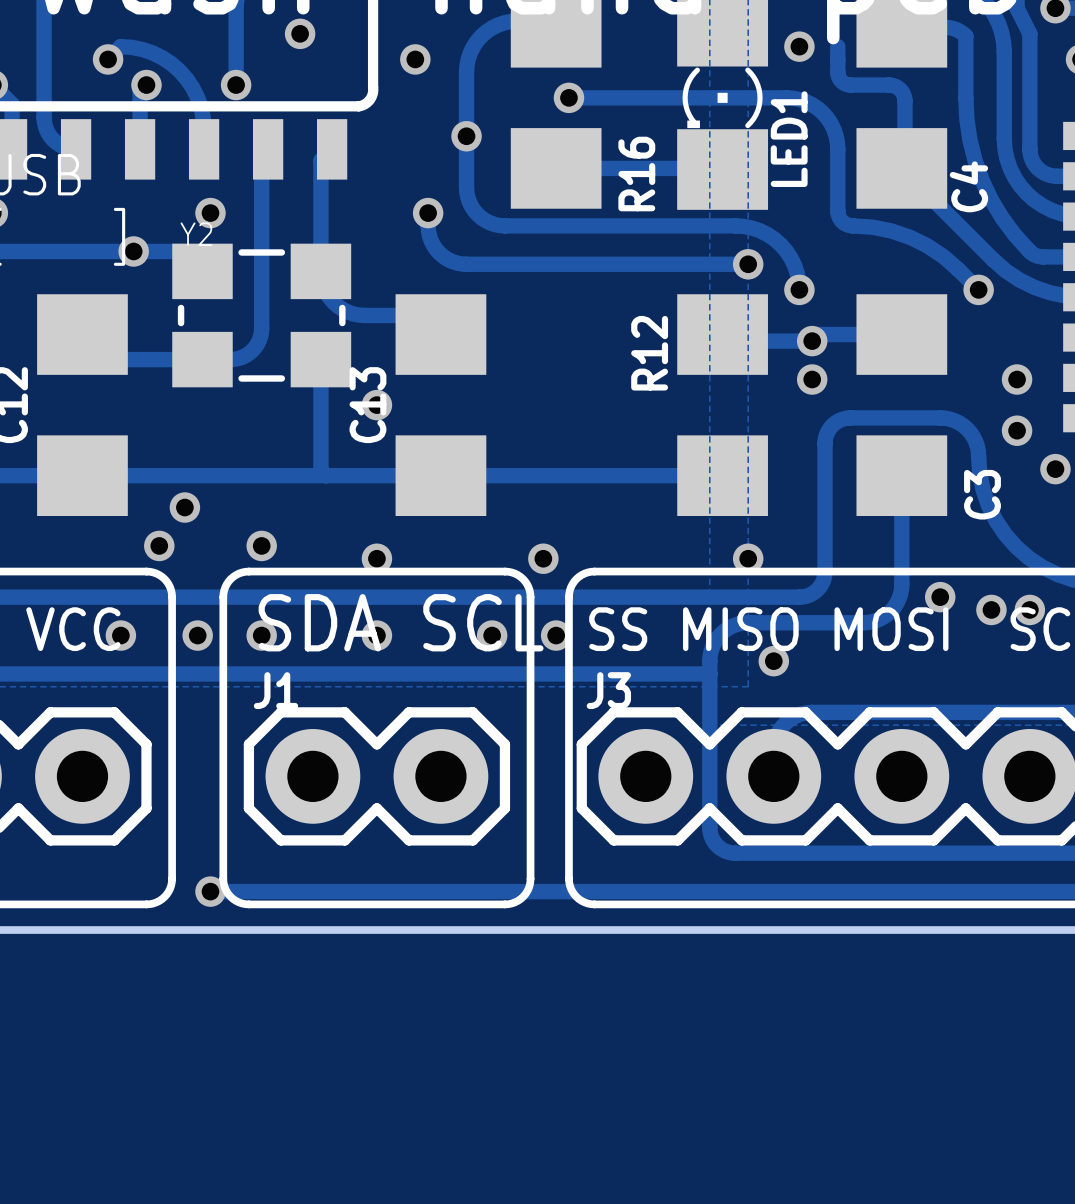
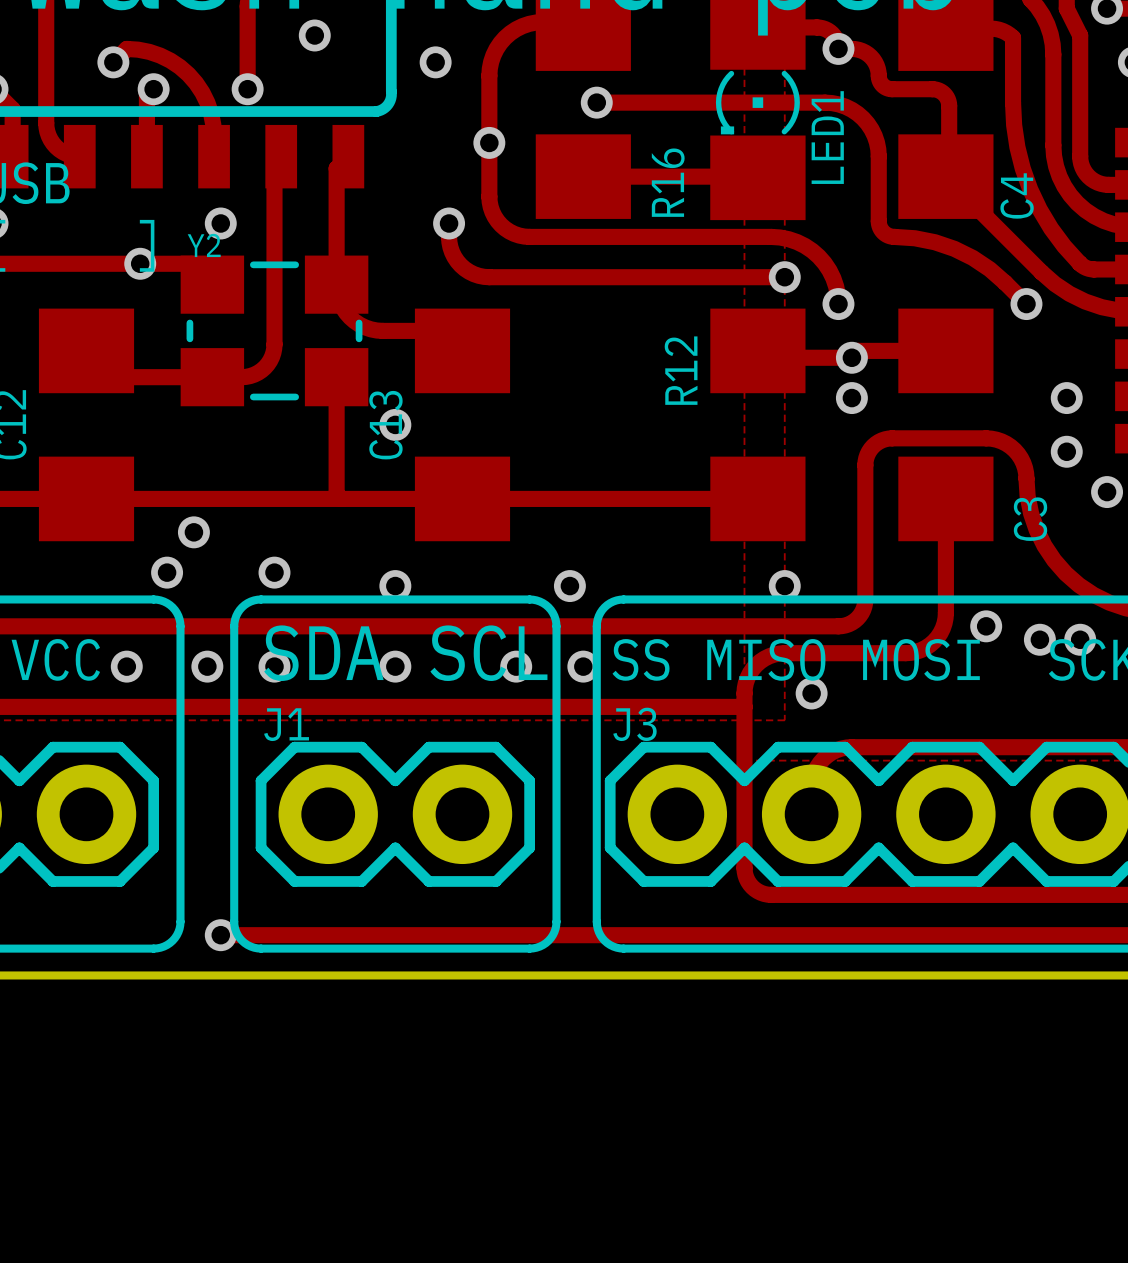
track: (837, 46) (837, 72) -> (757, 27) (825, 29) (835, 38) (838, 48) (855, 49) (868, 54) (875, 62) (878, 75)

